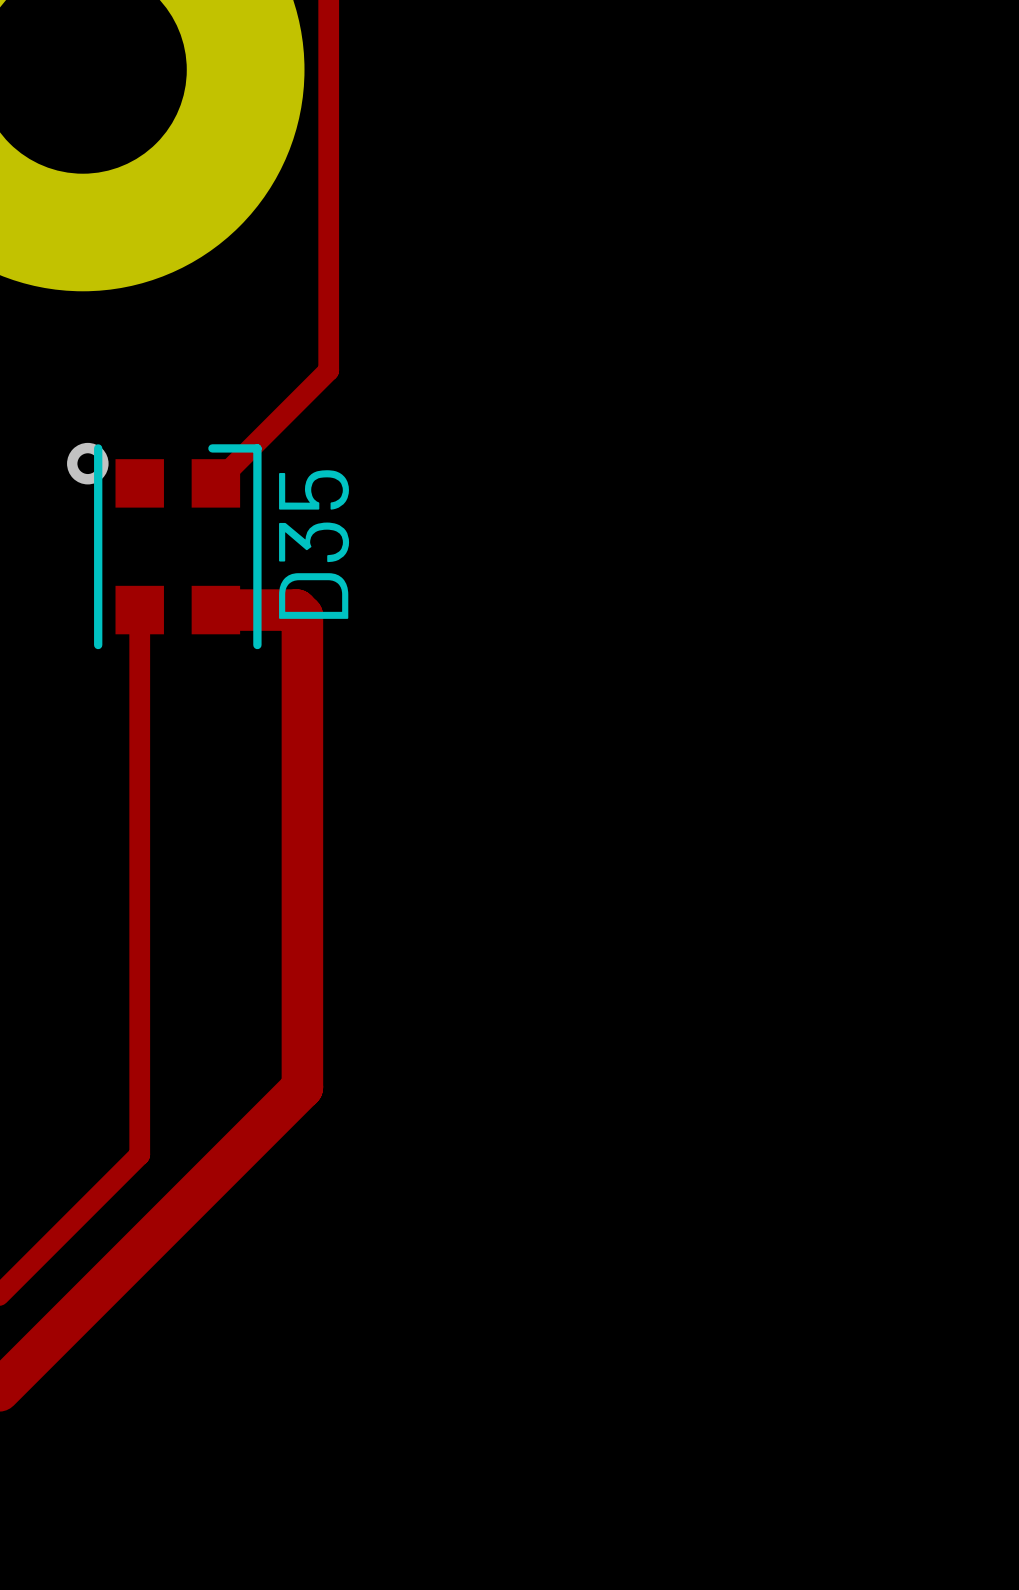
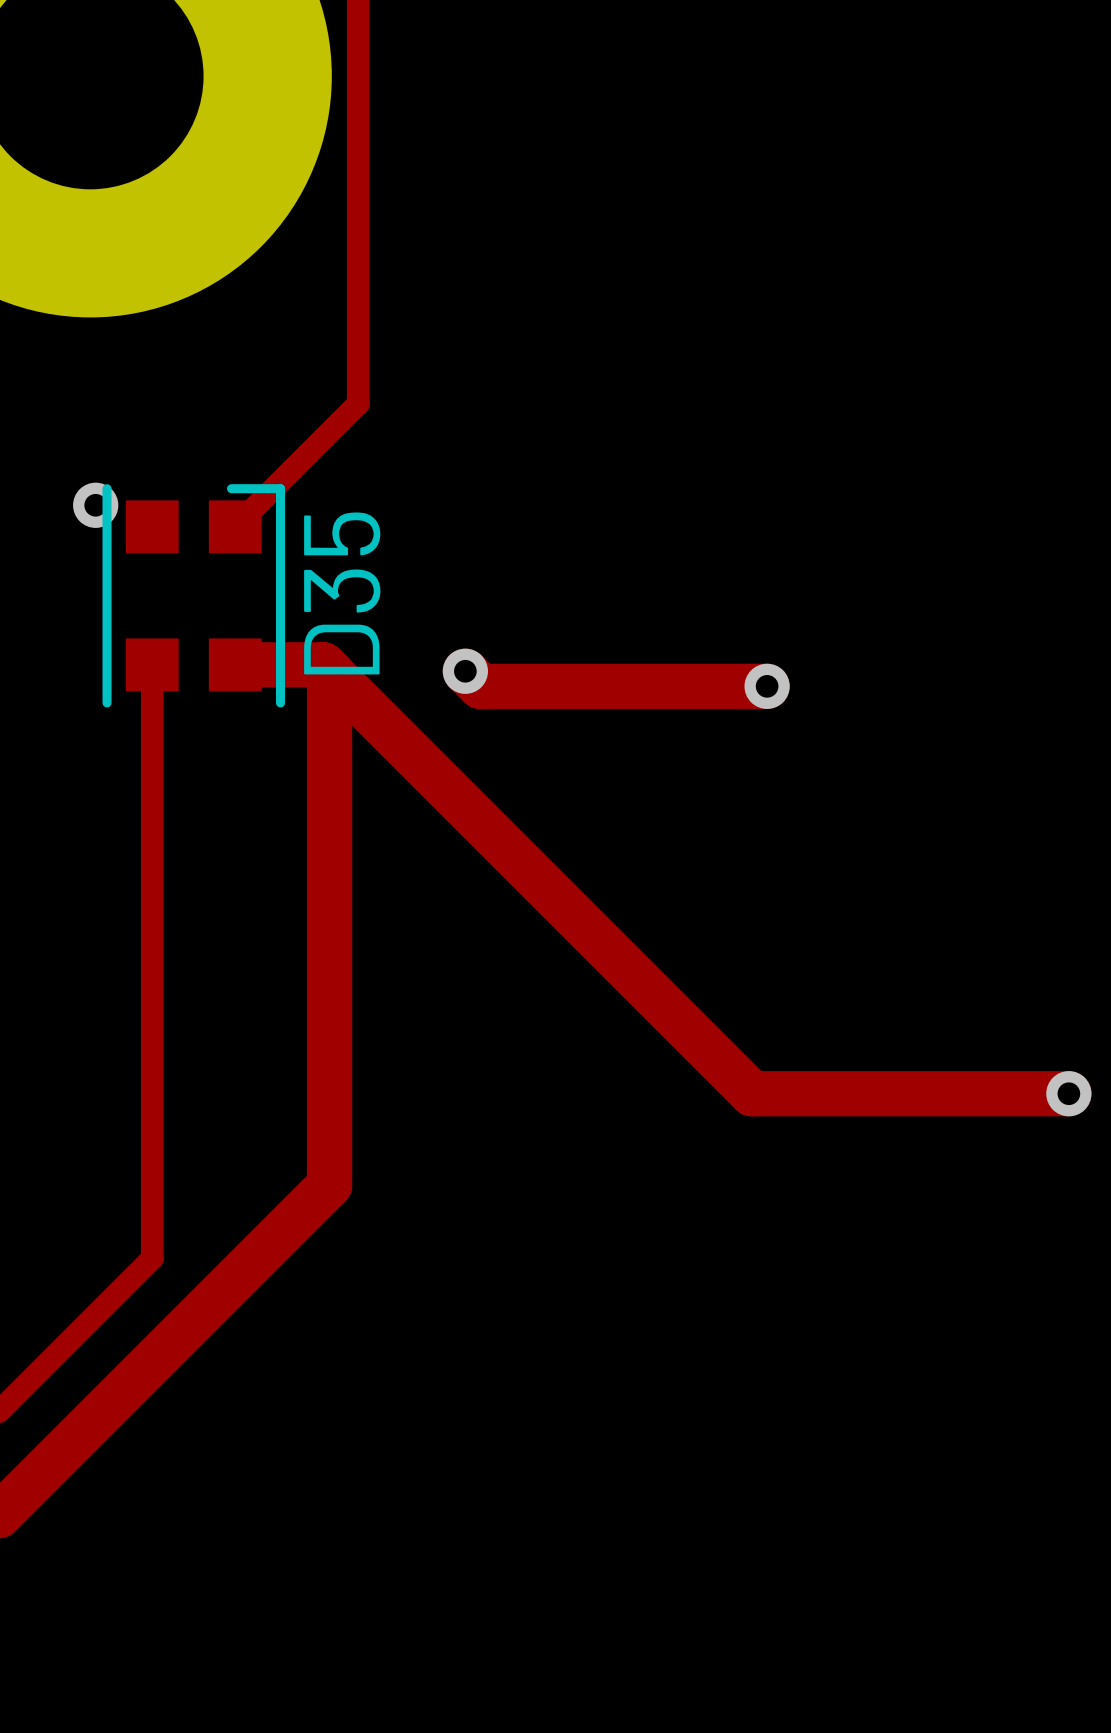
track: none -> (329, 671) (752, 1093) (1068, 1093)
track: none -> (465, 671) (480, 686) (767, 686)
via: none -> (465, 671)
via: none -> (767, 686)
via: none -> (1068, 1093)

